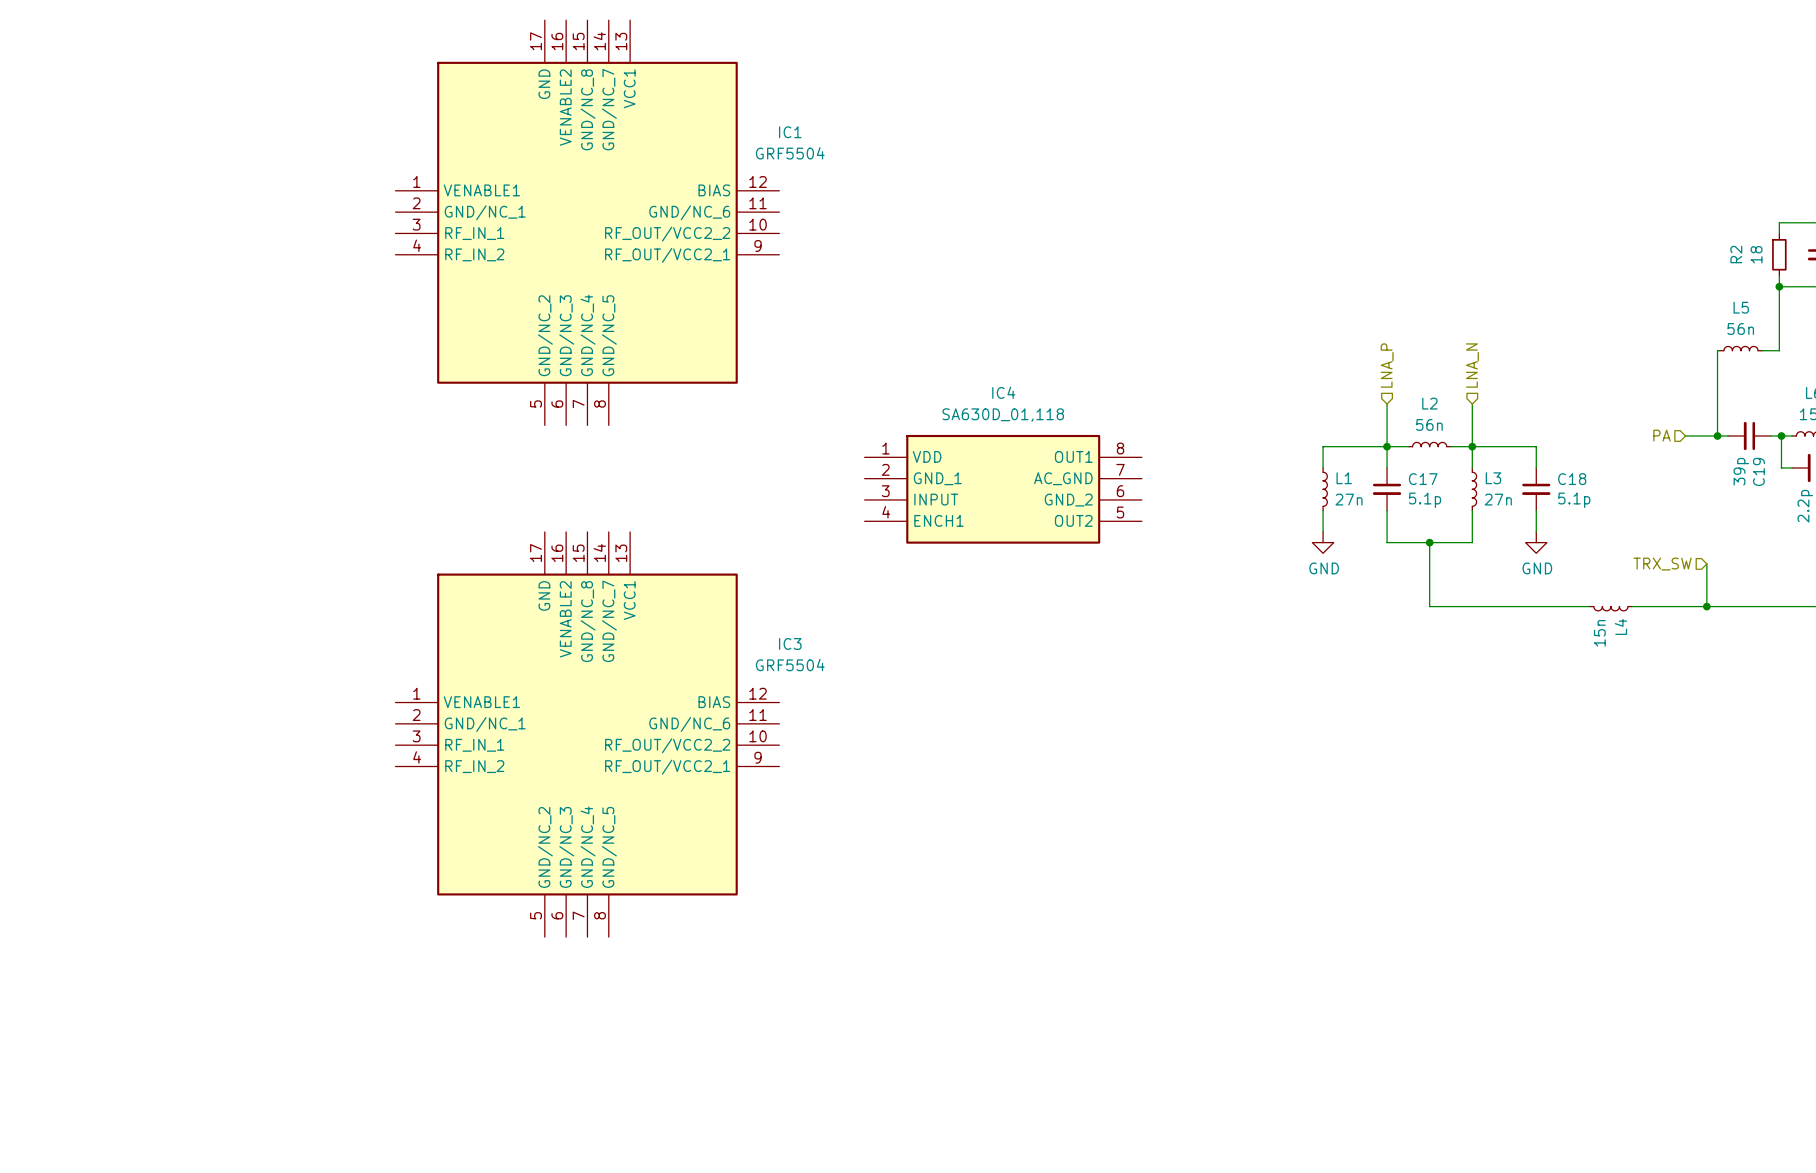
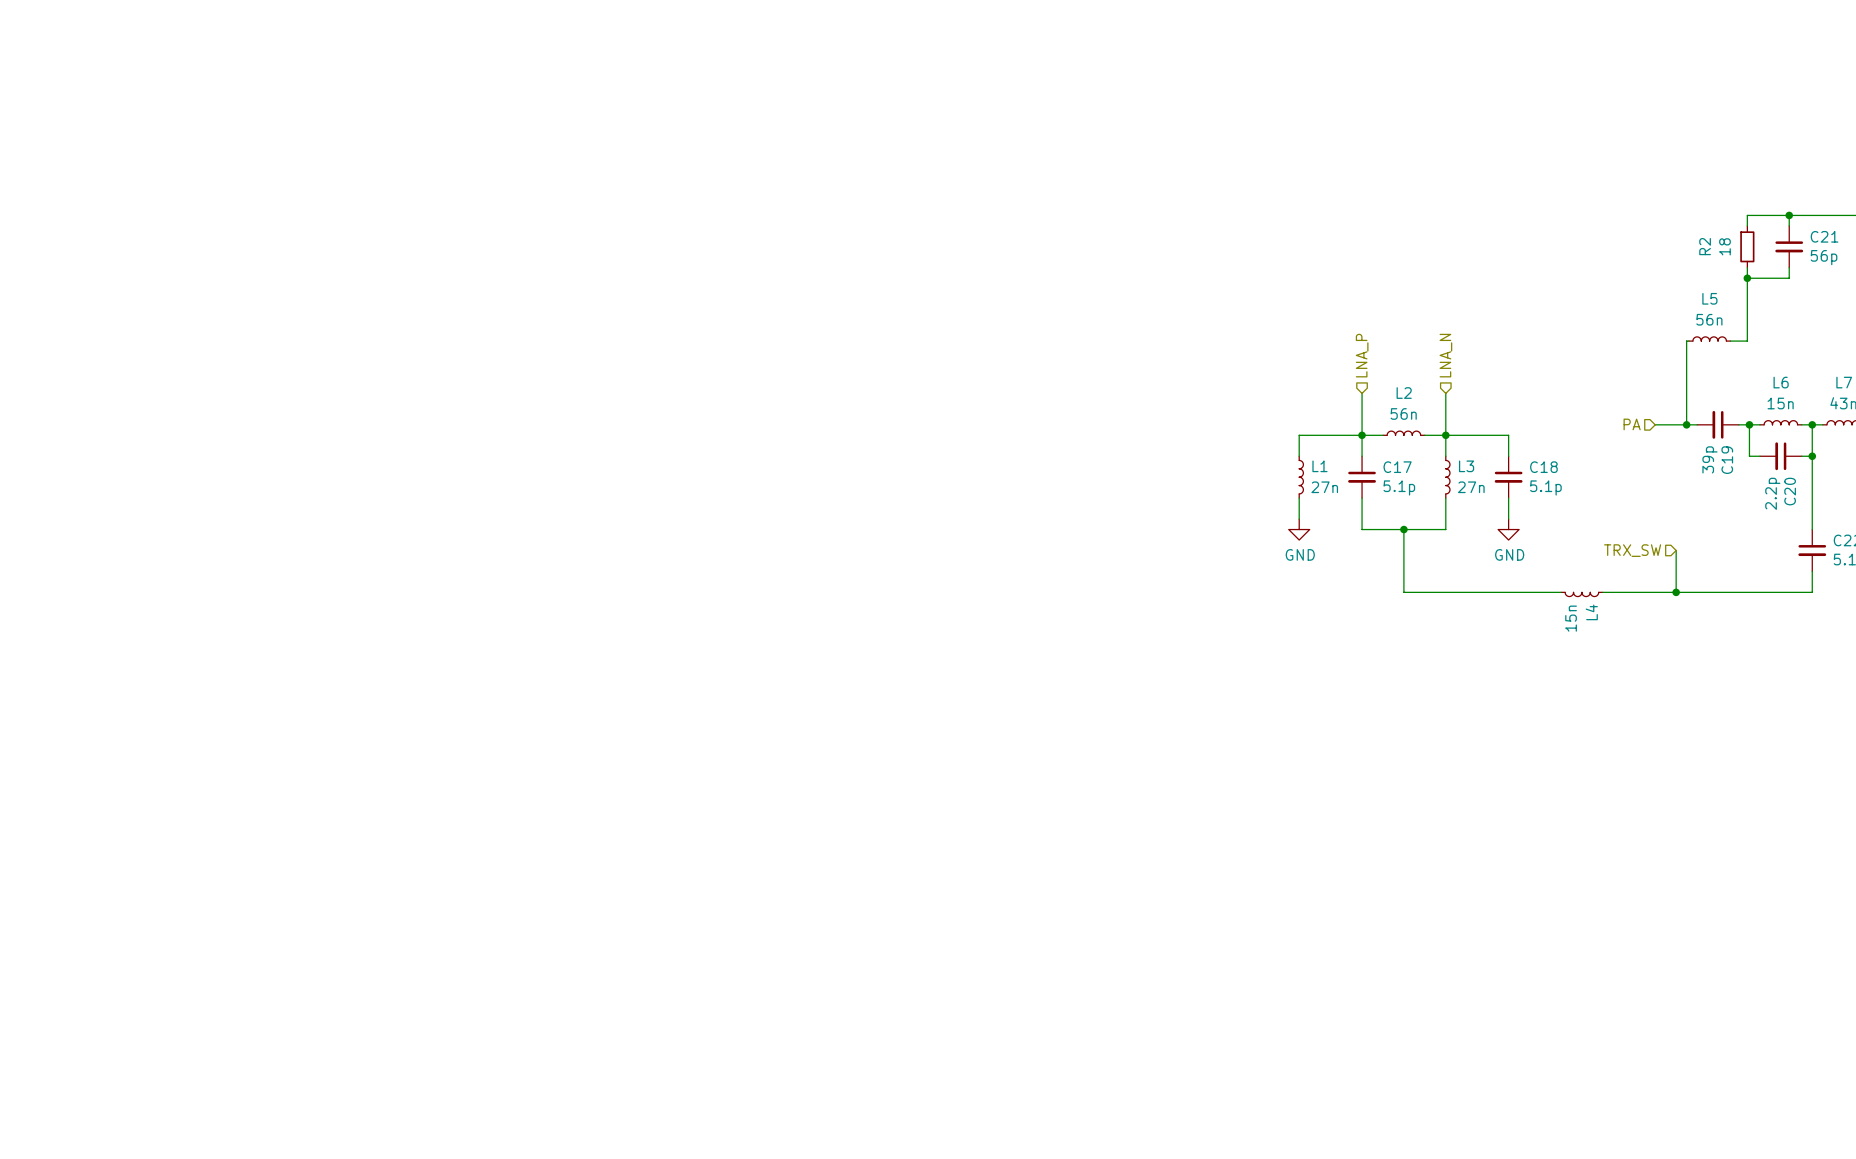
IC1: GRF5504 (587, 222) -> none
IC4: SA630D_01,118 (1003, 489) -> none
IC3: GRF5504 (587, 734) -> none

